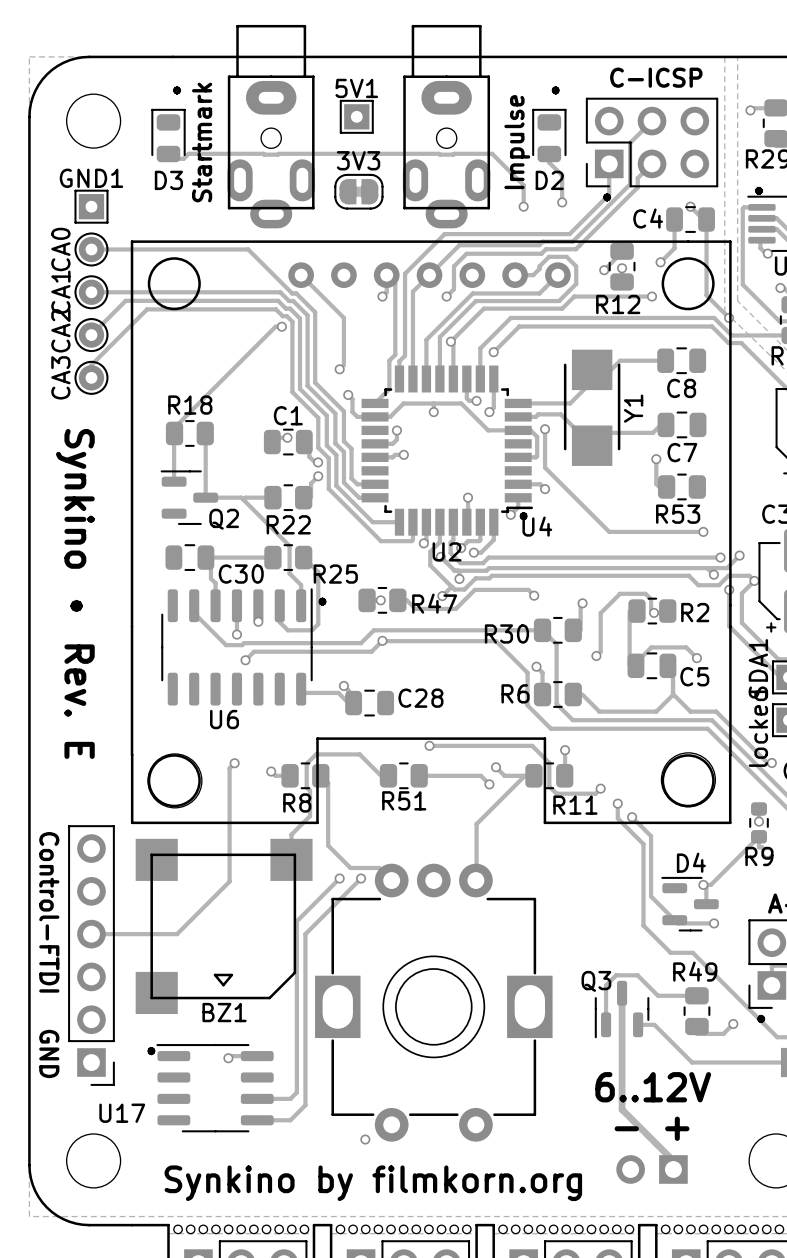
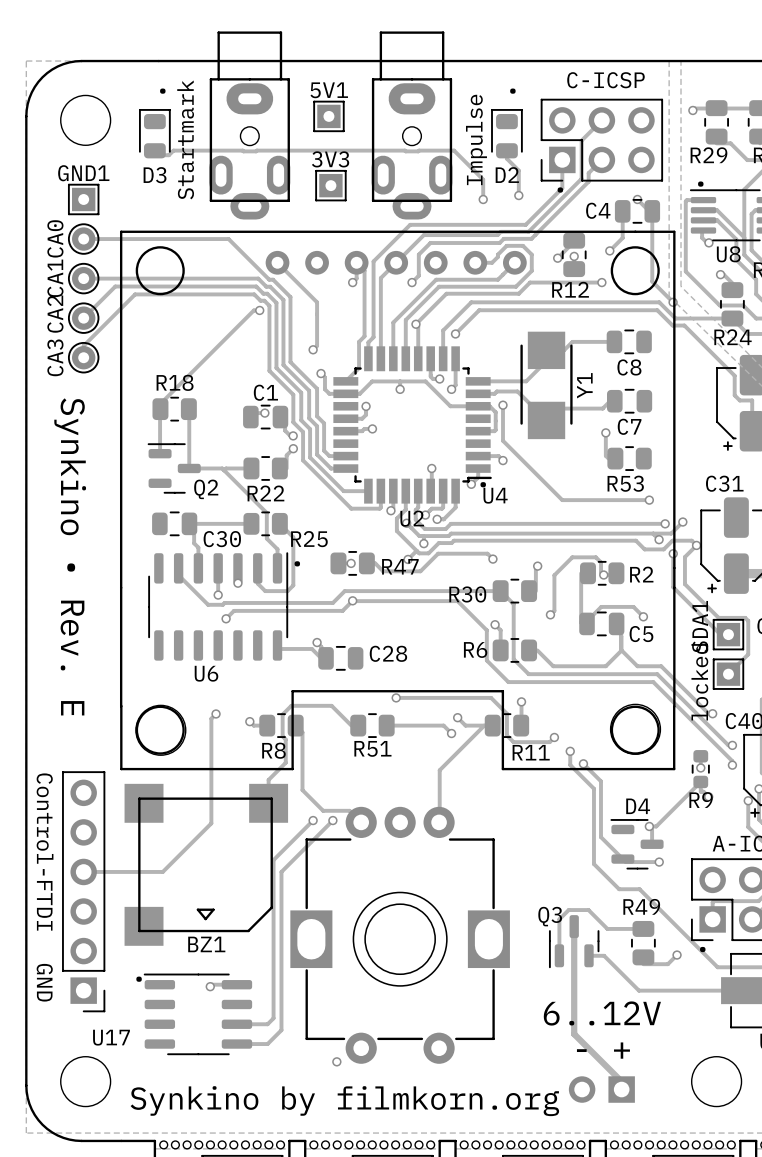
3V3 footprint: [334, 173, 384, 210] -> [315, 169, 347, 202]

